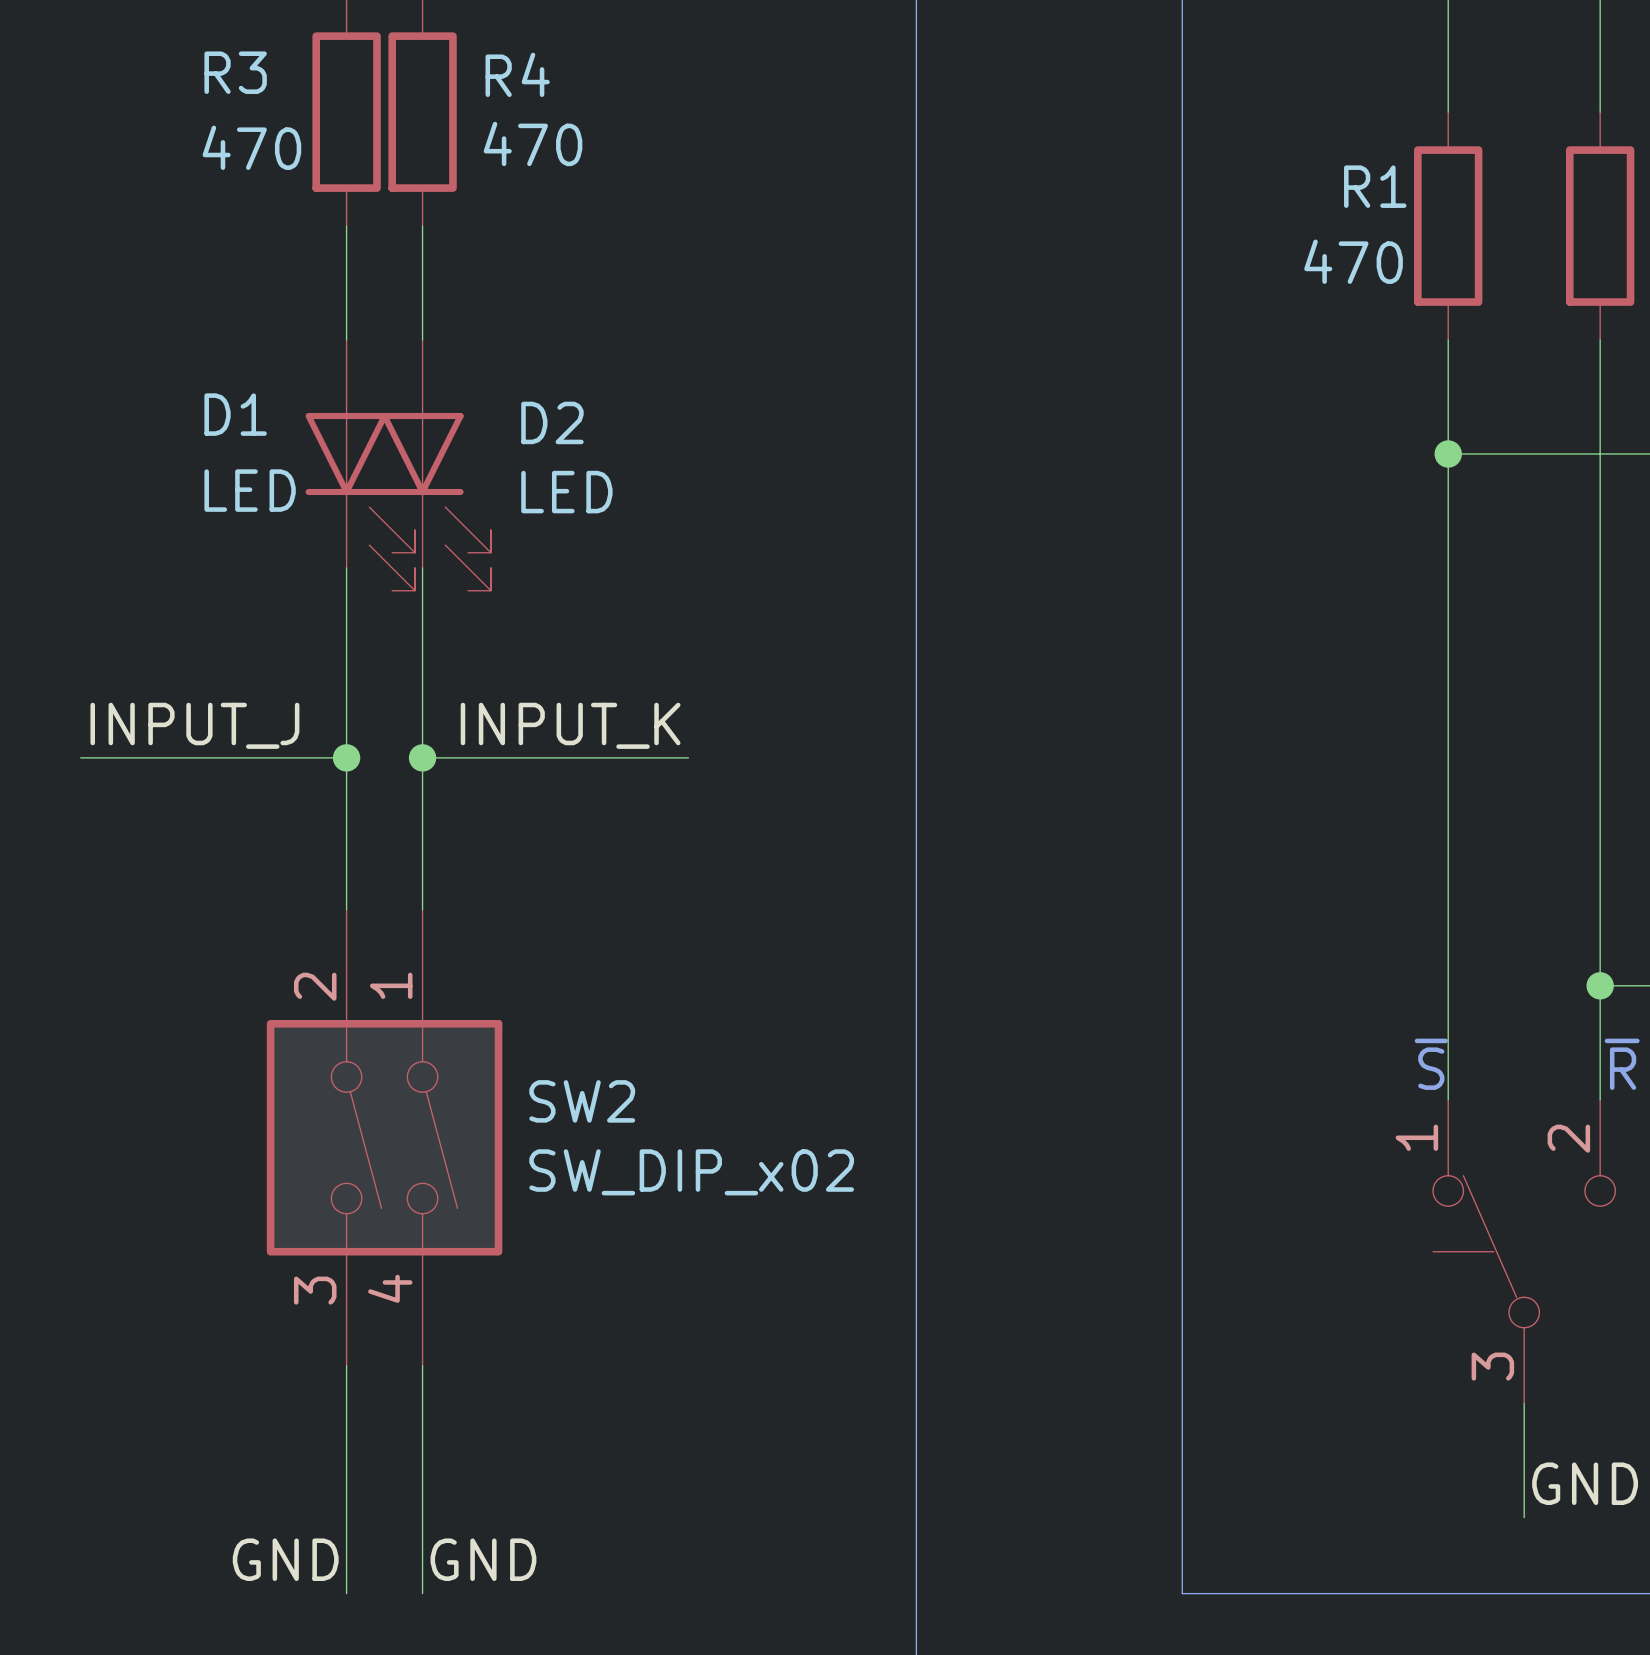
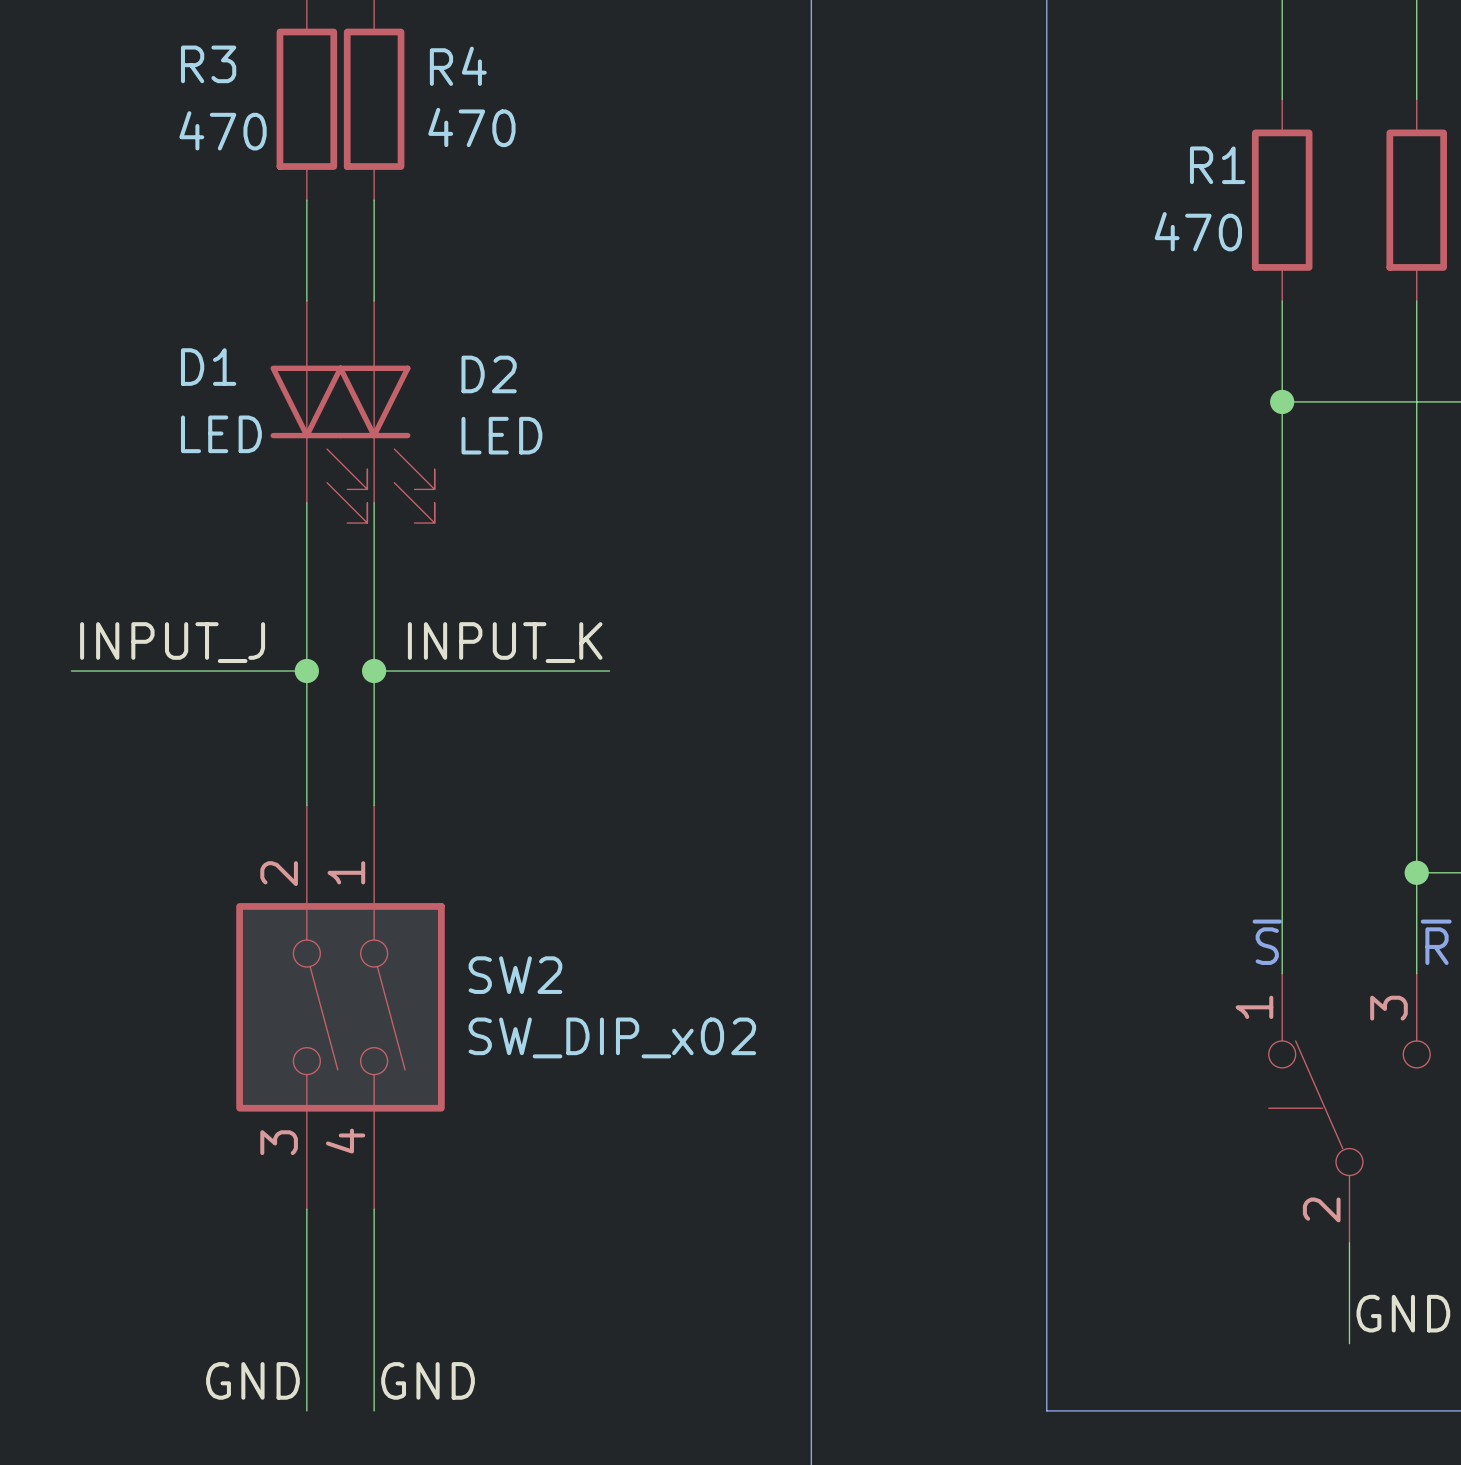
part pin number: 2 (1568, 1138) -> 3 (1388, 1008)
part pin number: 3 (1492, 1366) -> 2 (1321, 1209)

